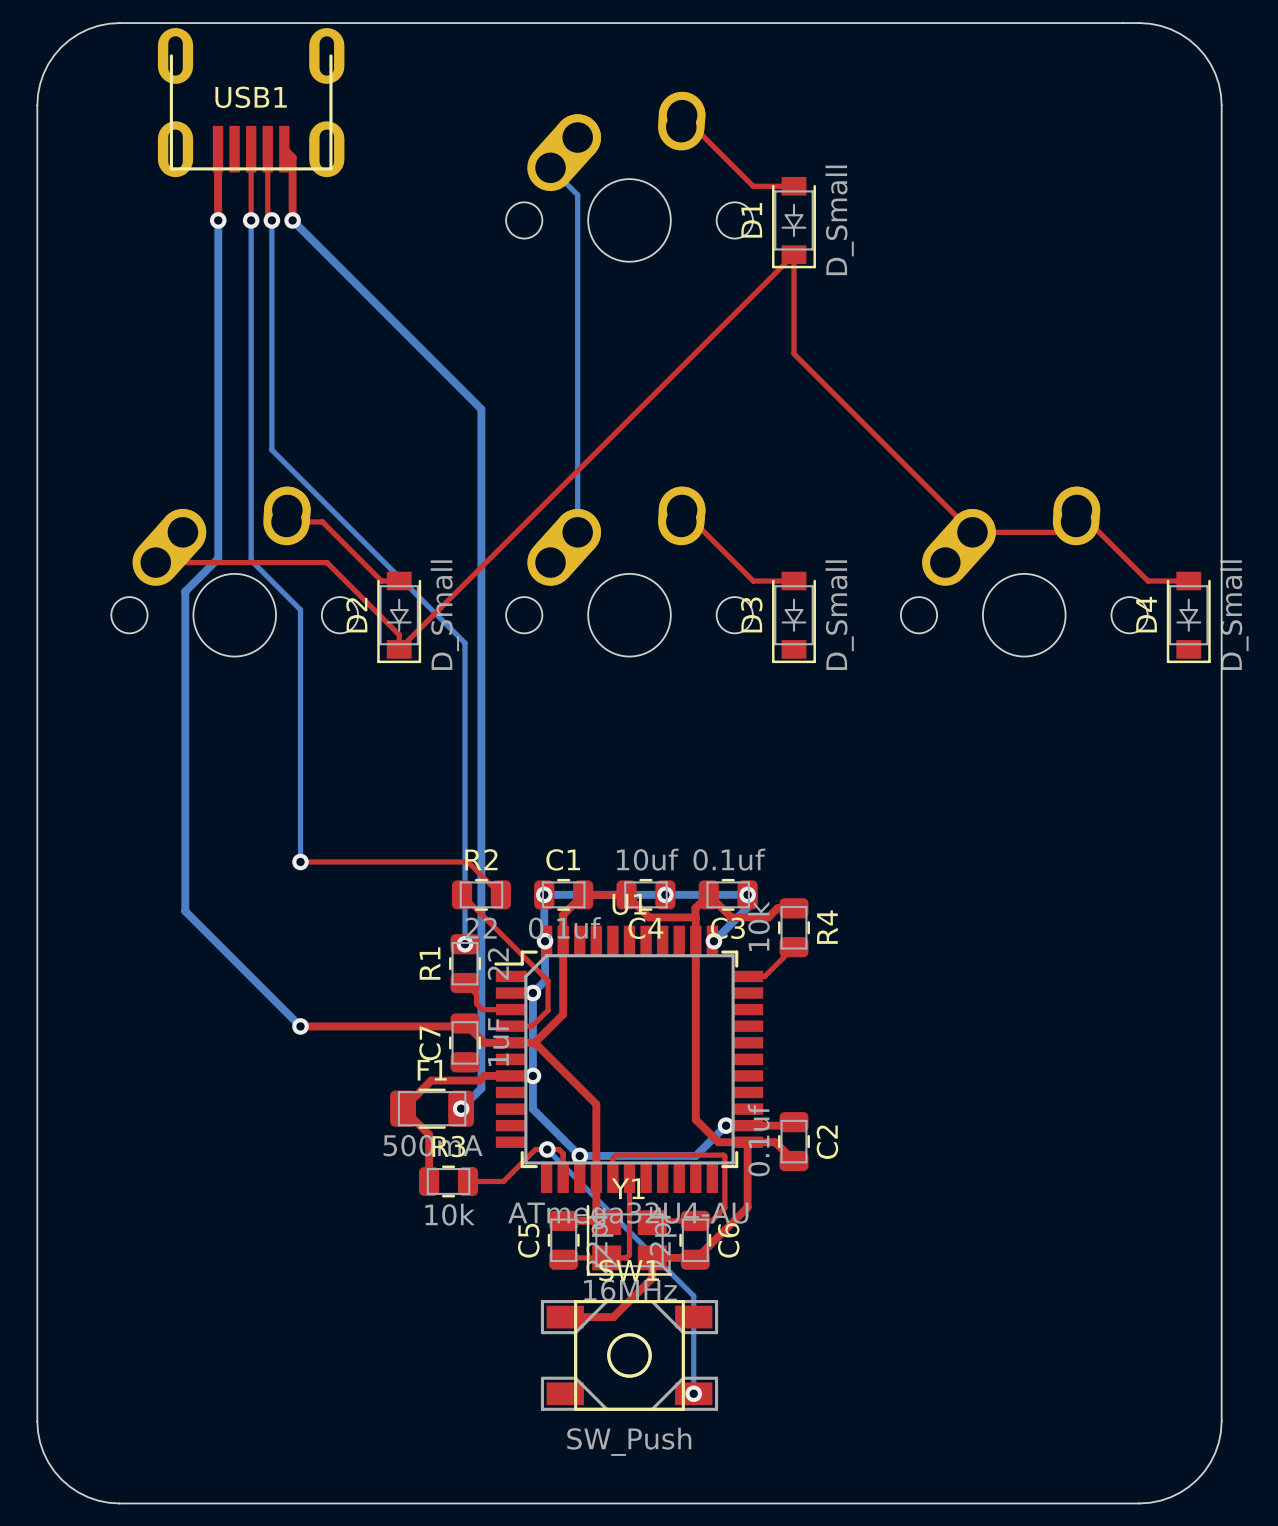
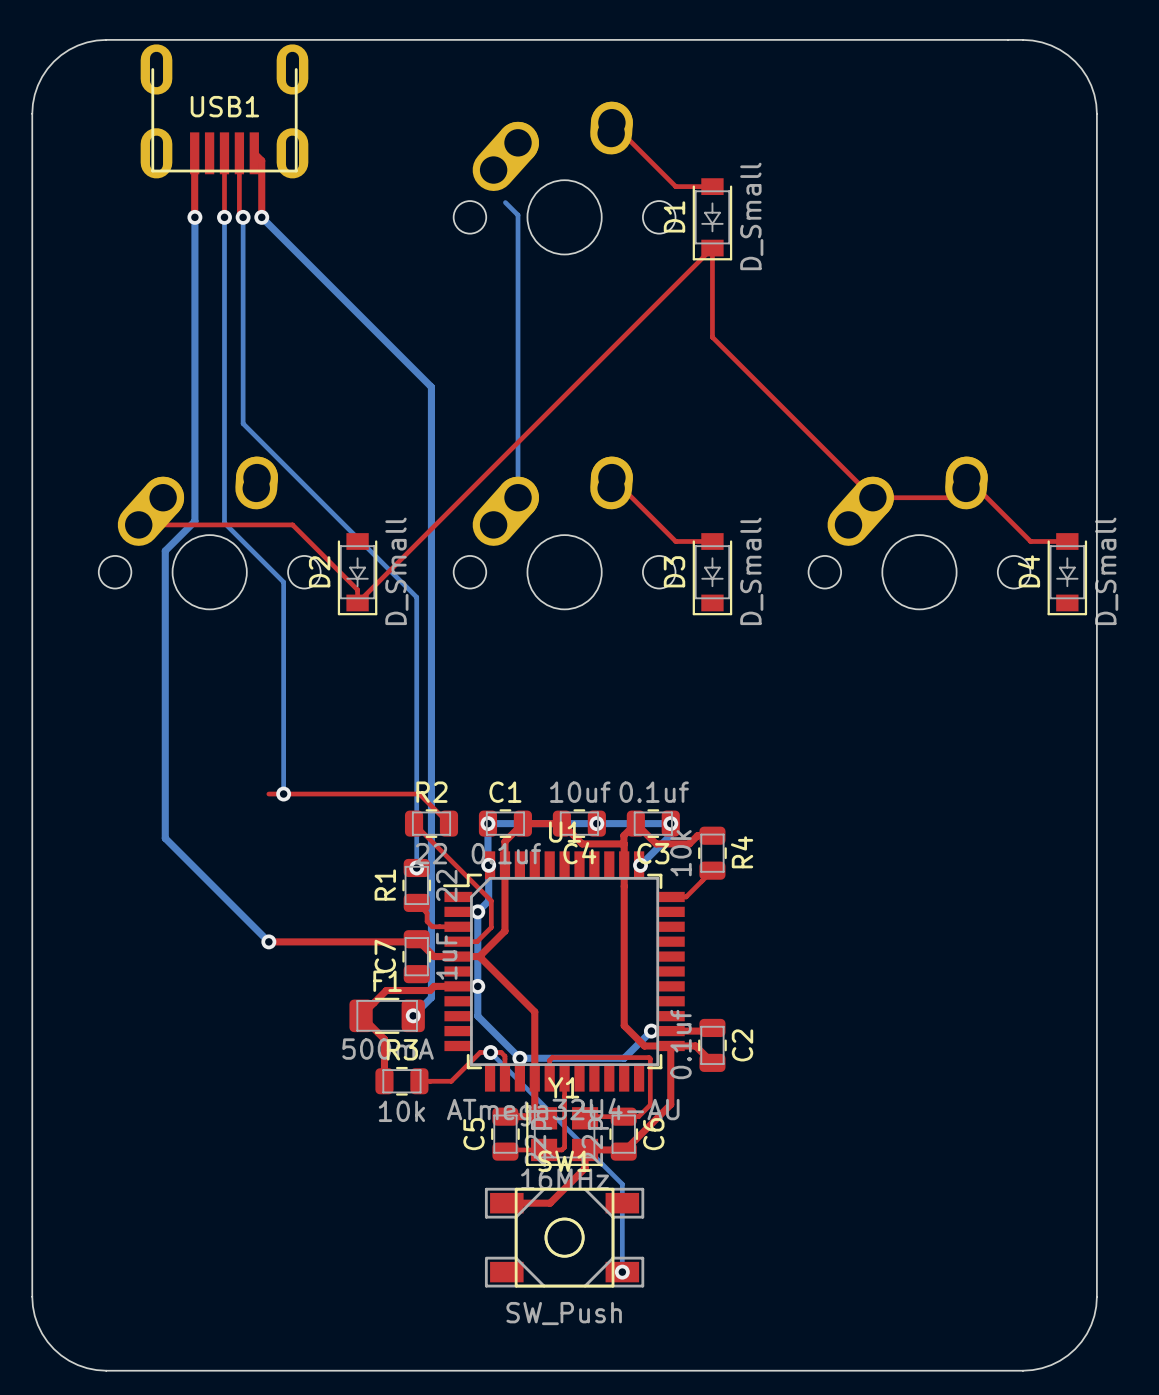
bottom track: (550, 167) (577, 194) (577, 217) -> (505, 202) (518, 215)
top track: (286, 521) (322, 521) (381, 581) (399, 581) -> none
bottom track: (300, 609) (300, 861) -> (268, 567) (283, 582) (283, 794)
via position: (300, 861) -> (283, 794)

